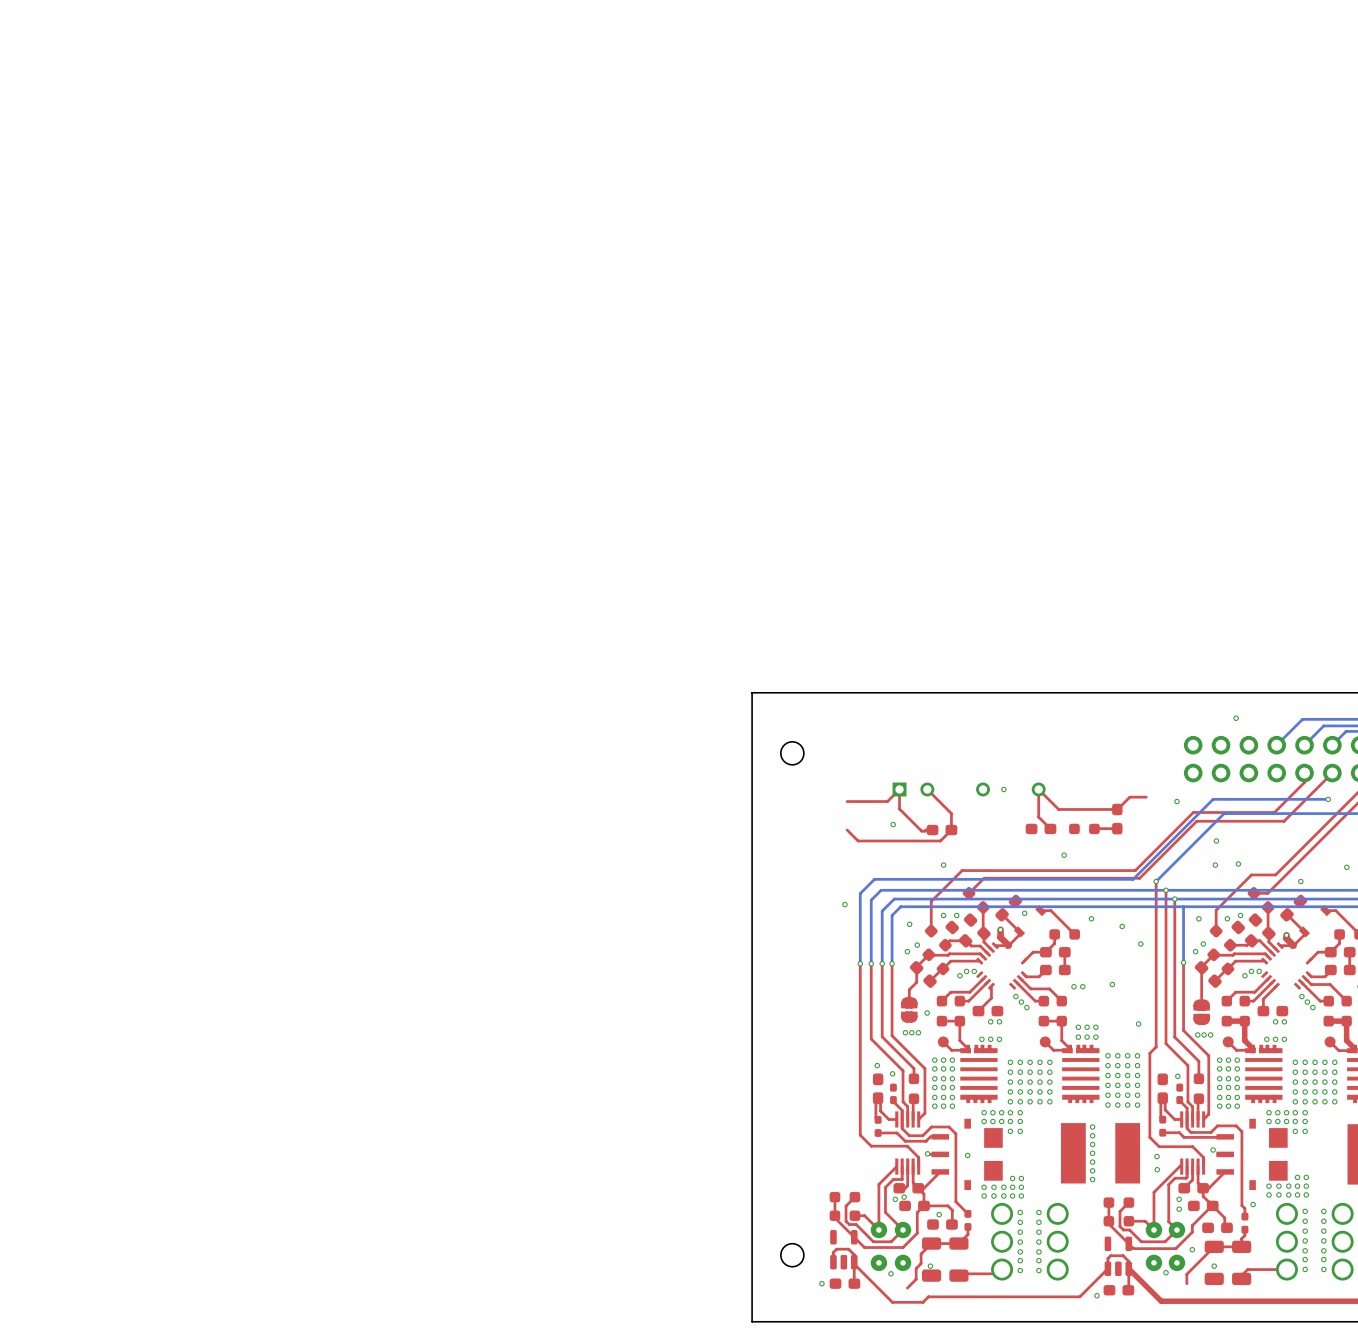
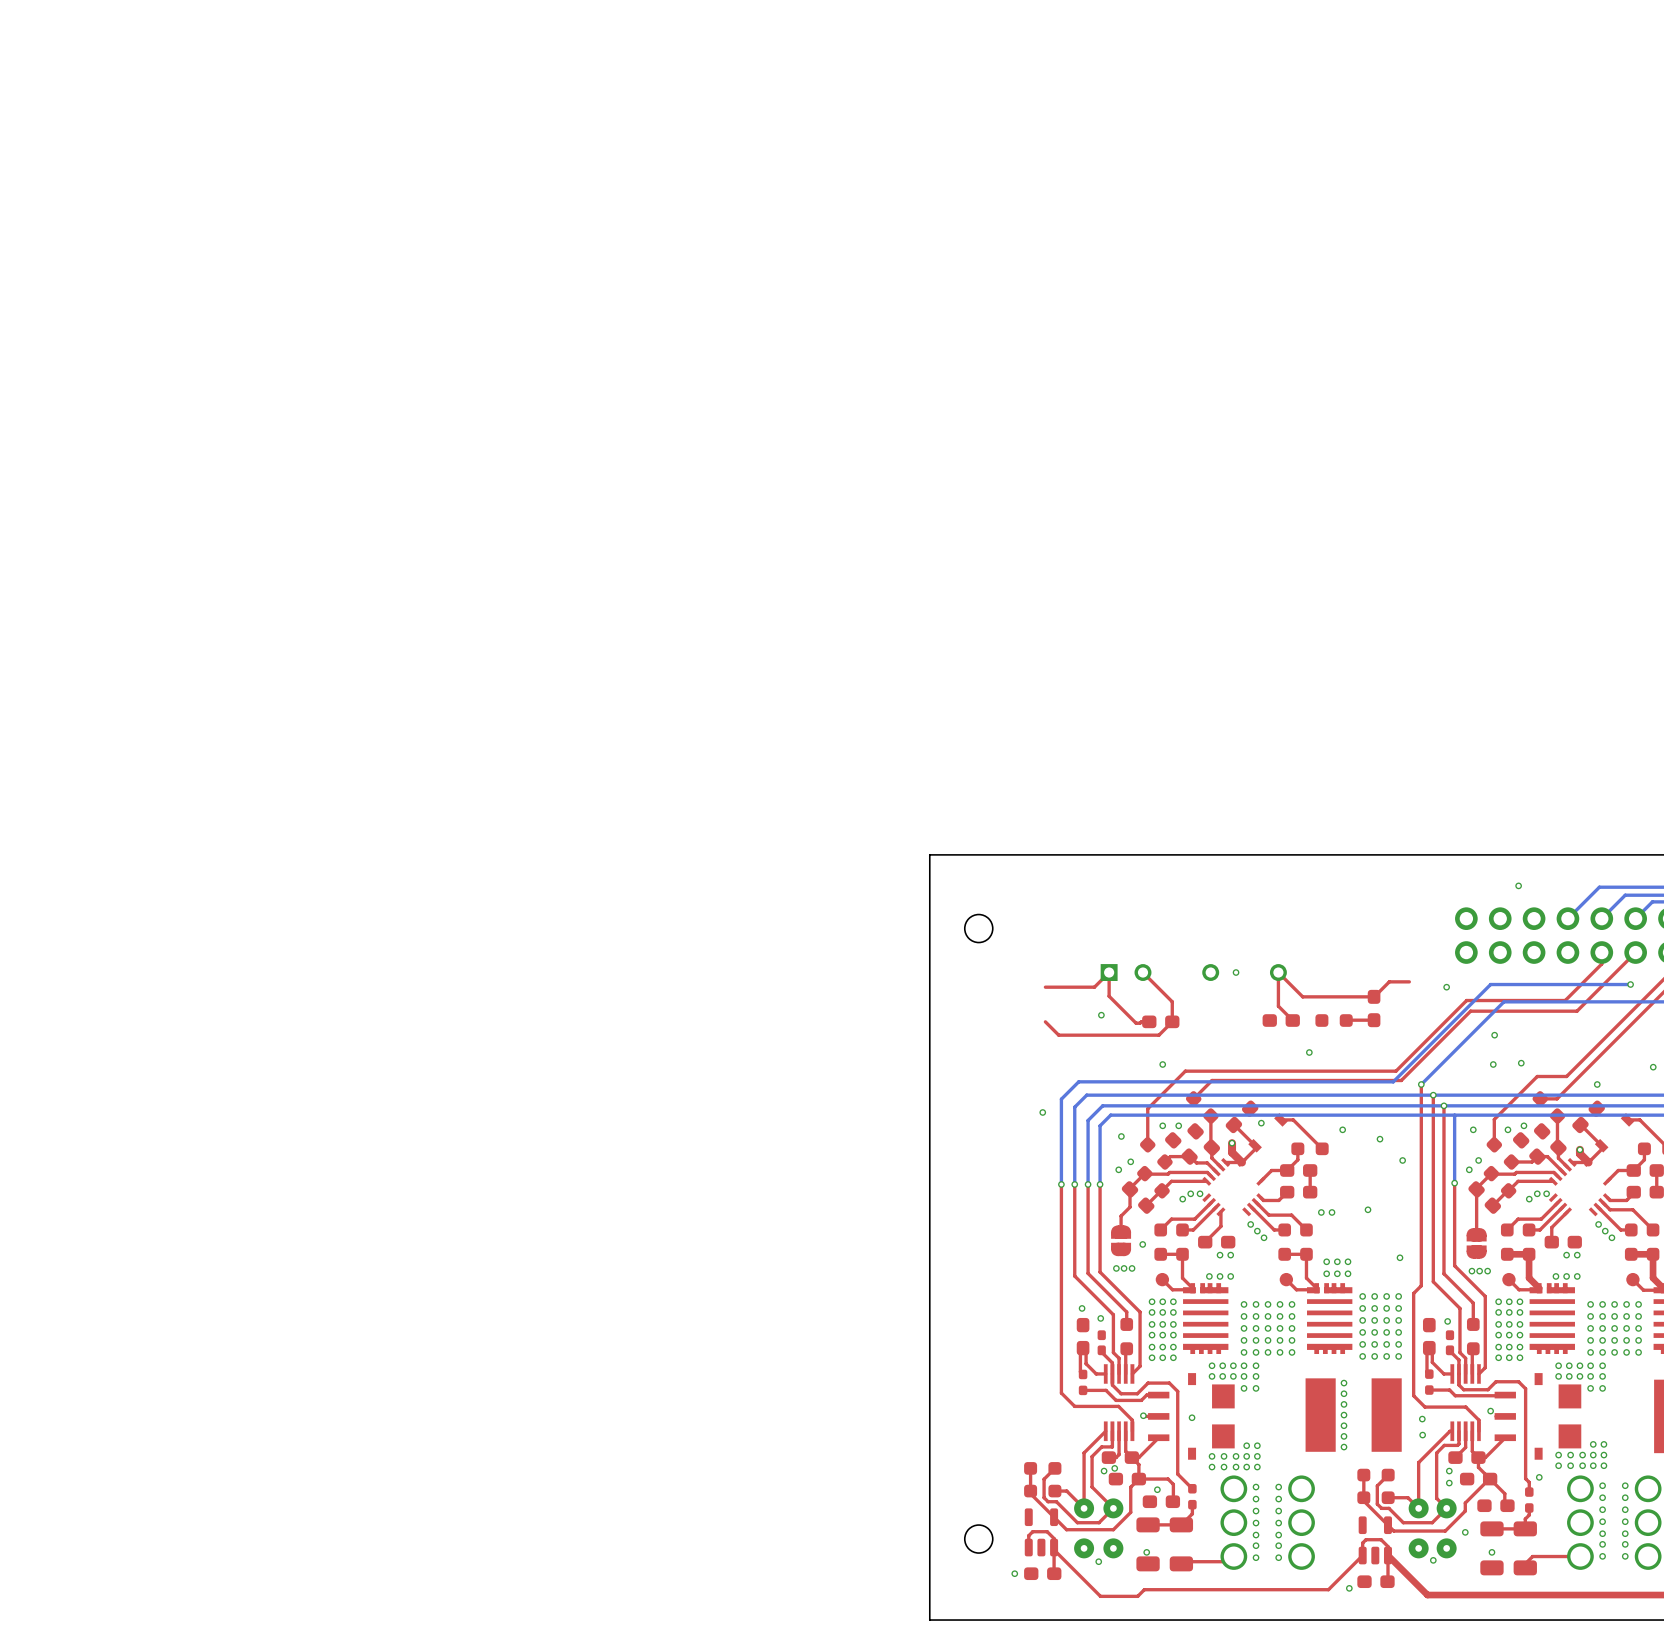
top track: (931, 1243) (921, 1254) (921, 1263) (916, 1268) (916, 1279) (907, 1288) -> none
top track: (1214, 1246) (1186, 1274) (1186, 1283) -> none

